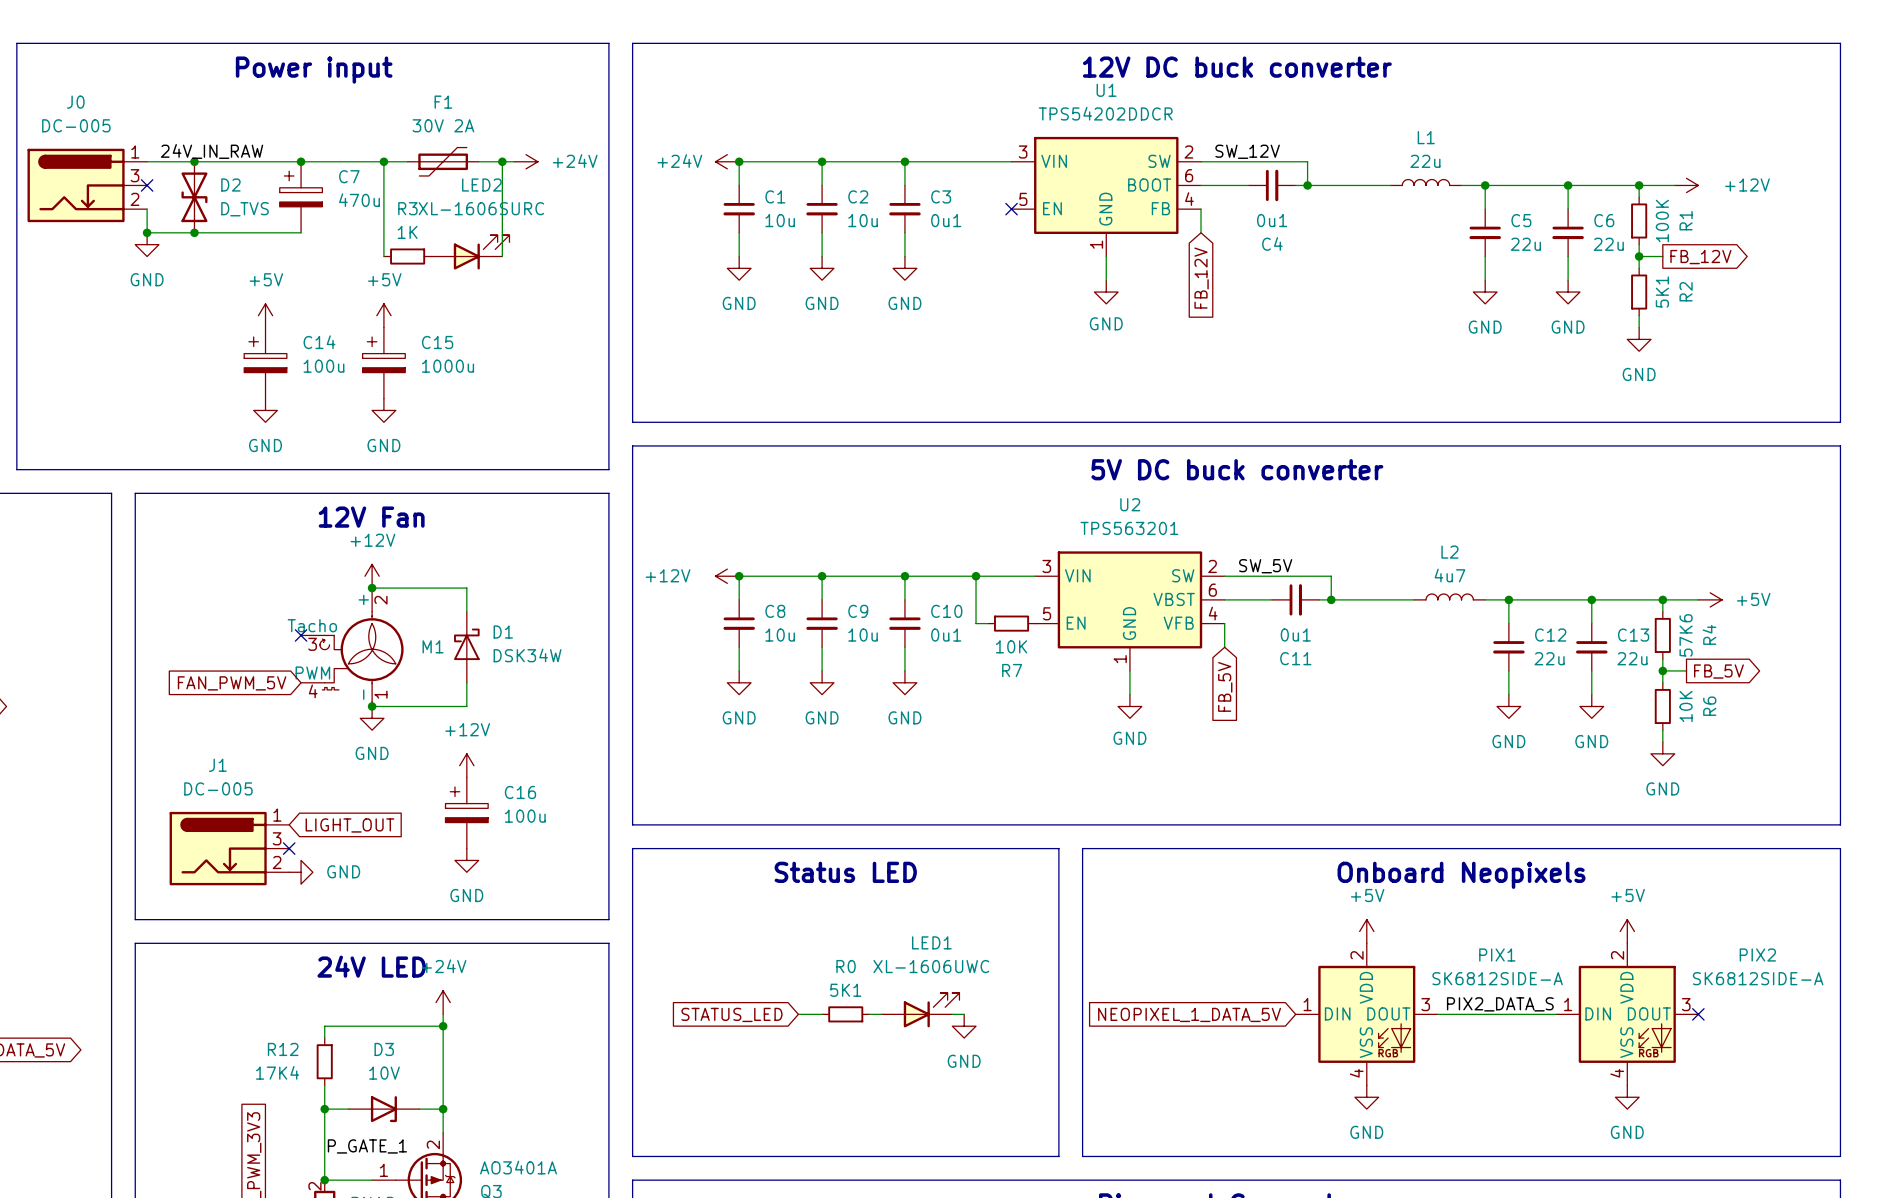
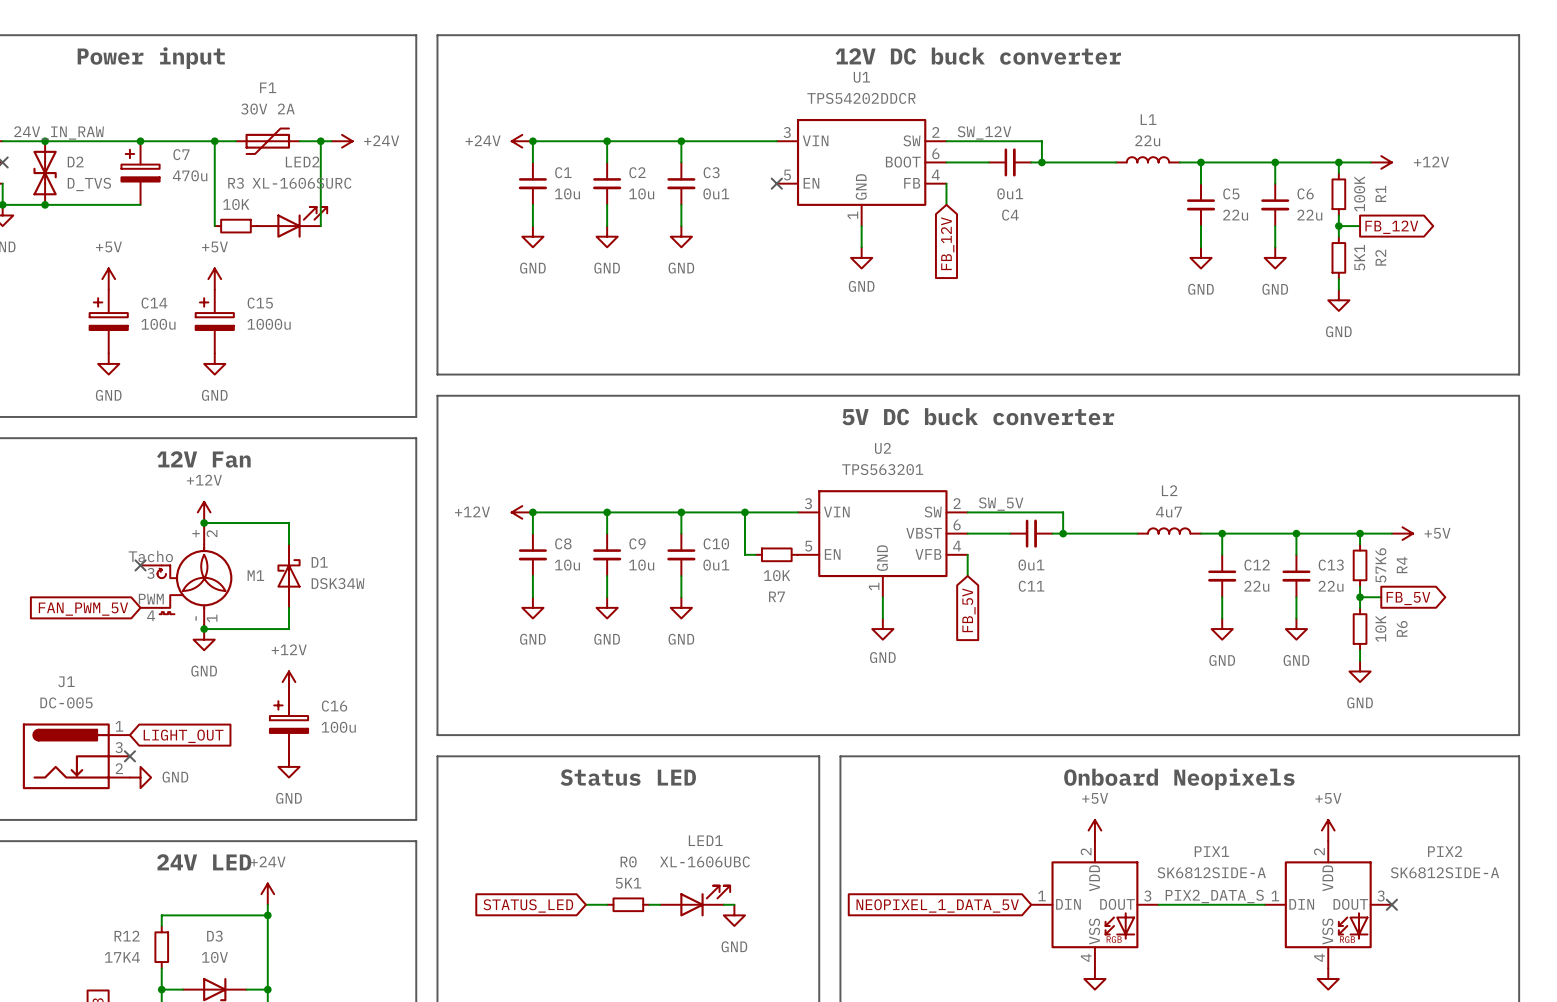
R3 value: 1K (407, 232) -> 10K (236, 204)
LED1 value: XL-1606UWC (931, 966) -> XL-1606UBC (704, 861)

